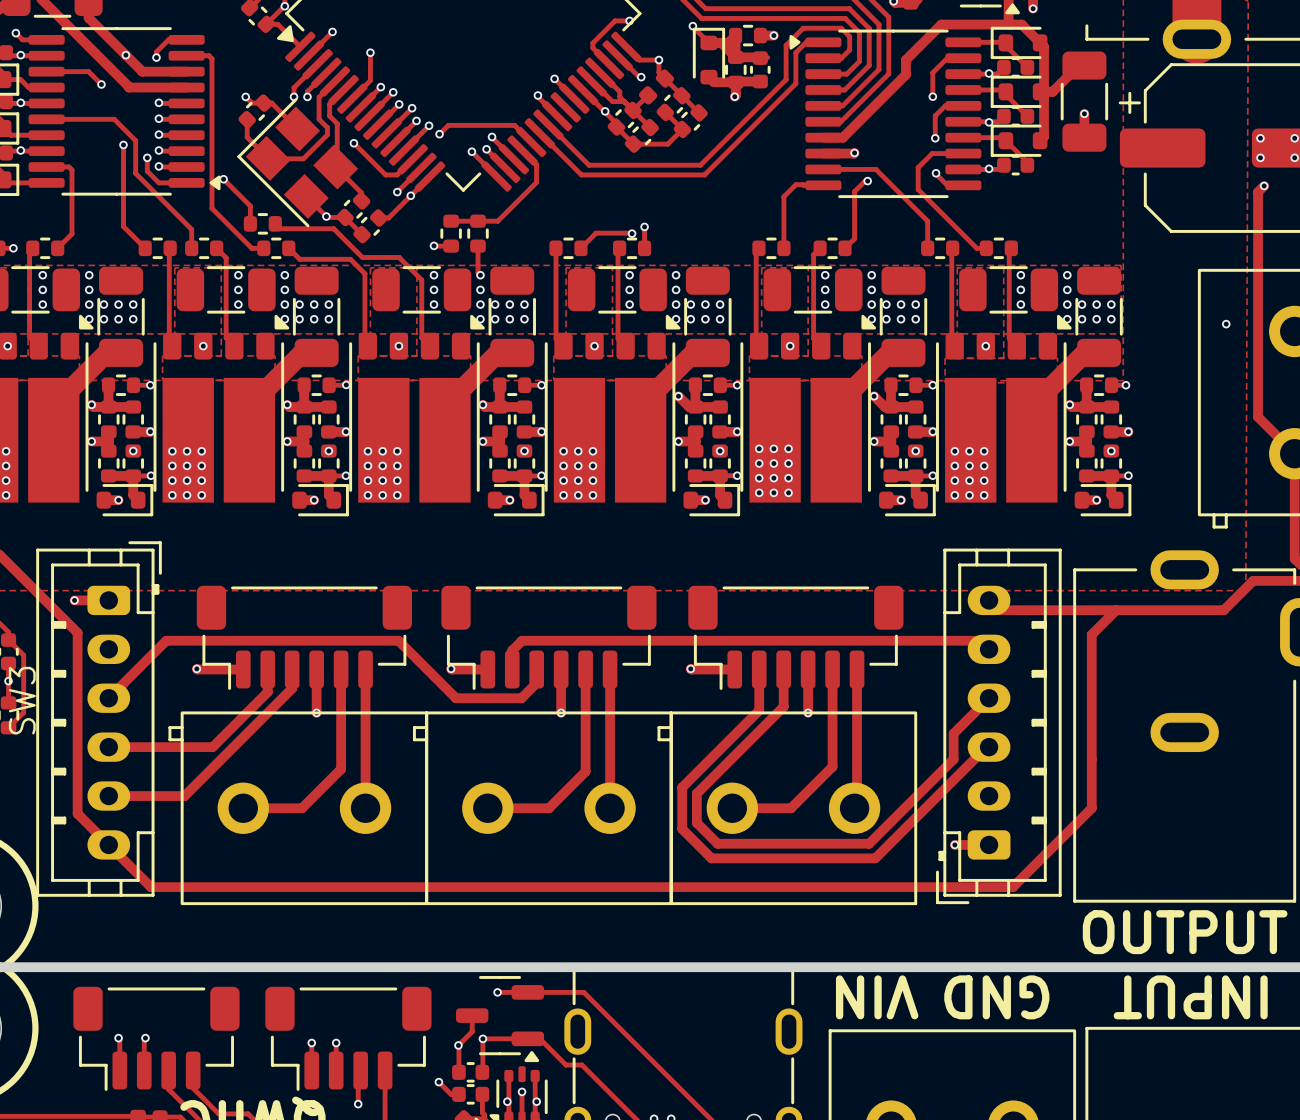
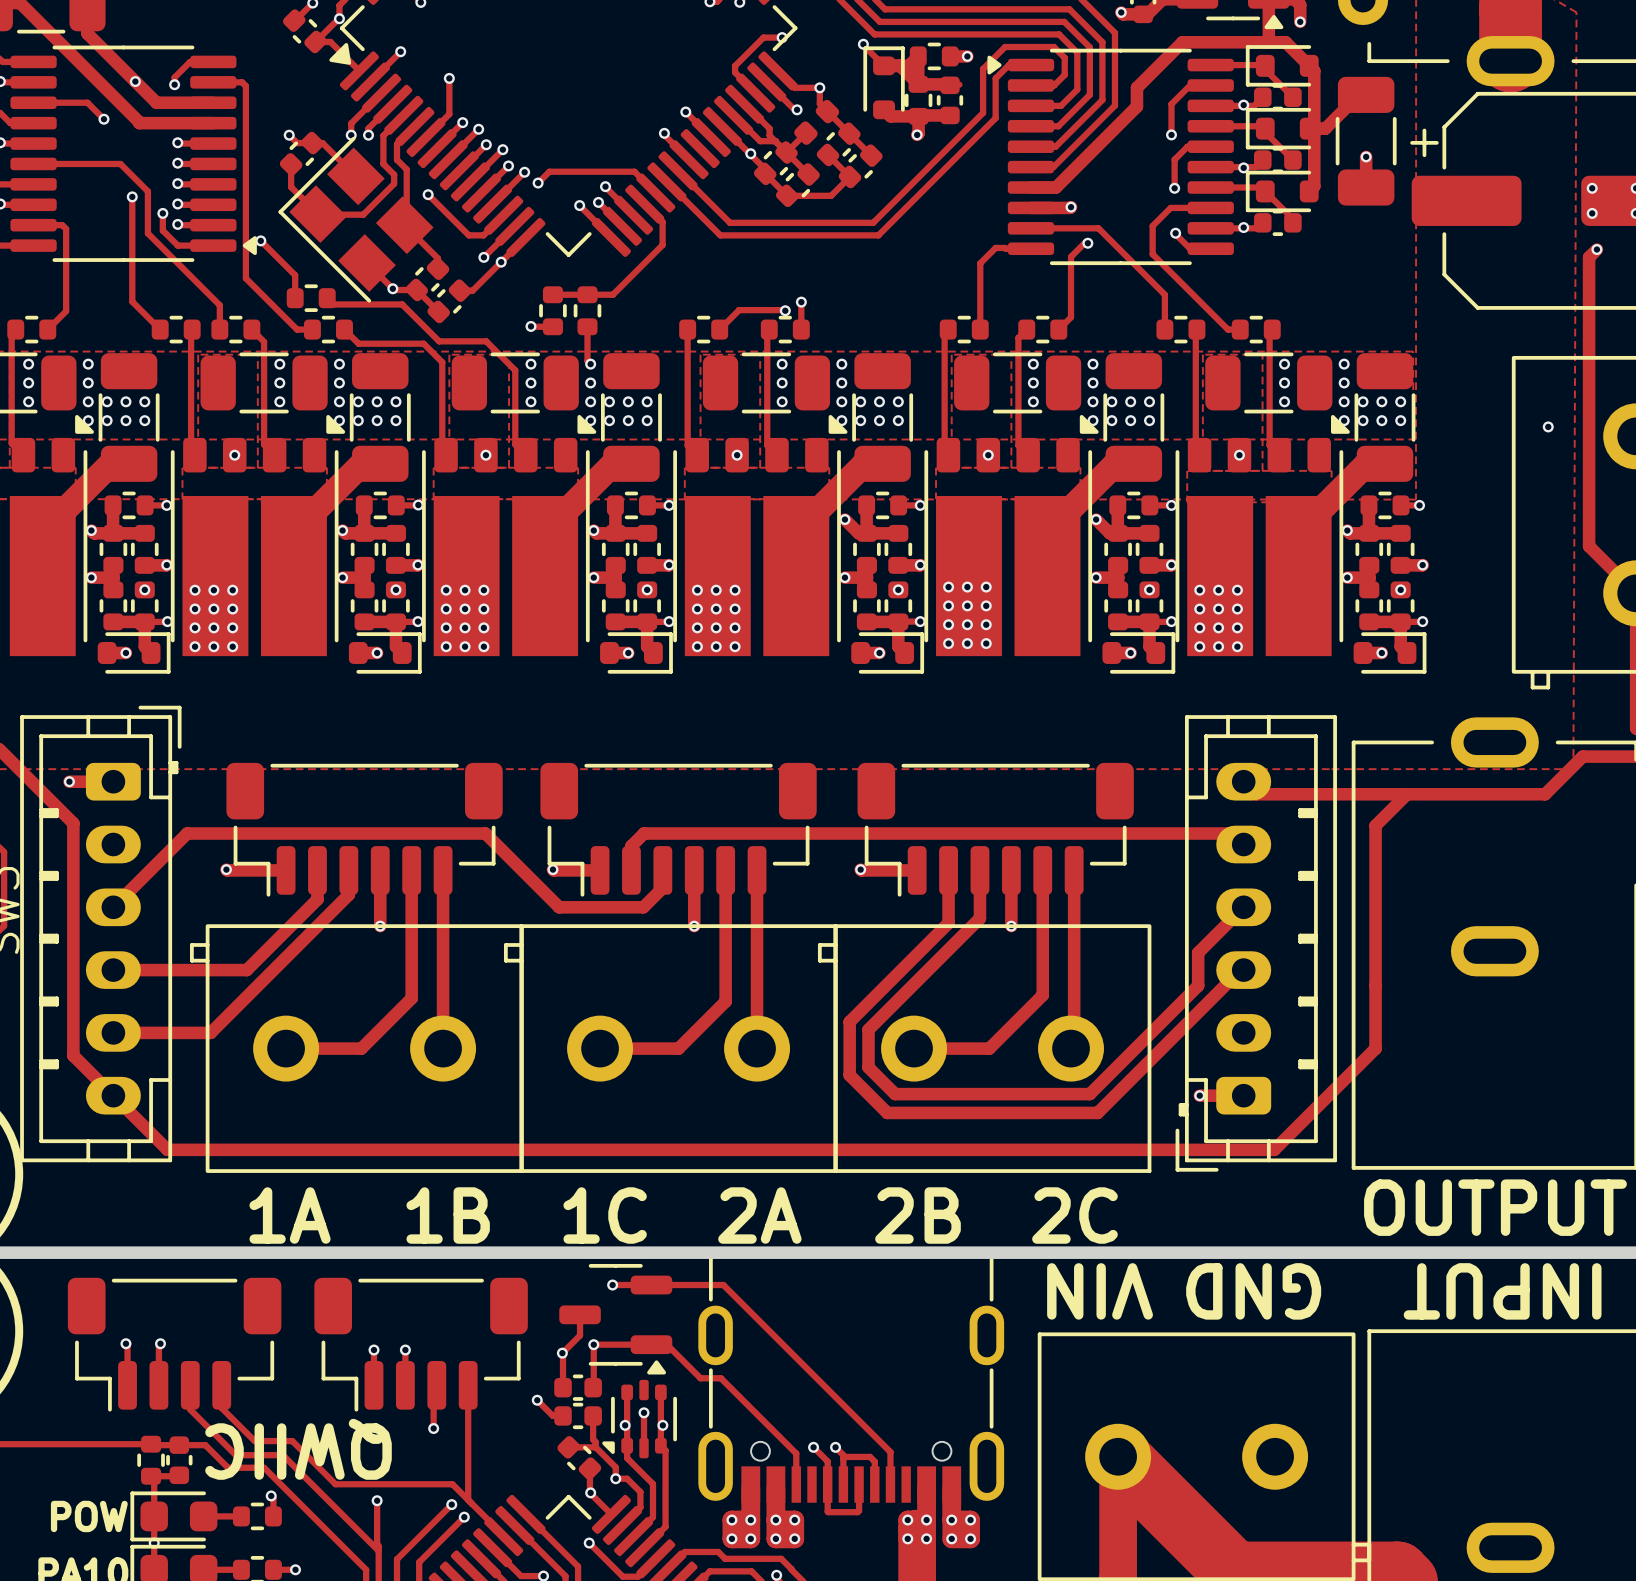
text: none -> 1A (290, 1215)
text: none -> 1B (448, 1215)
text: none -> 1C (605, 1215)
text: none -> 2A (759, 1215)
text: none -> 2B (917, 1215)
text: none -> 2C (1074, 1215)

